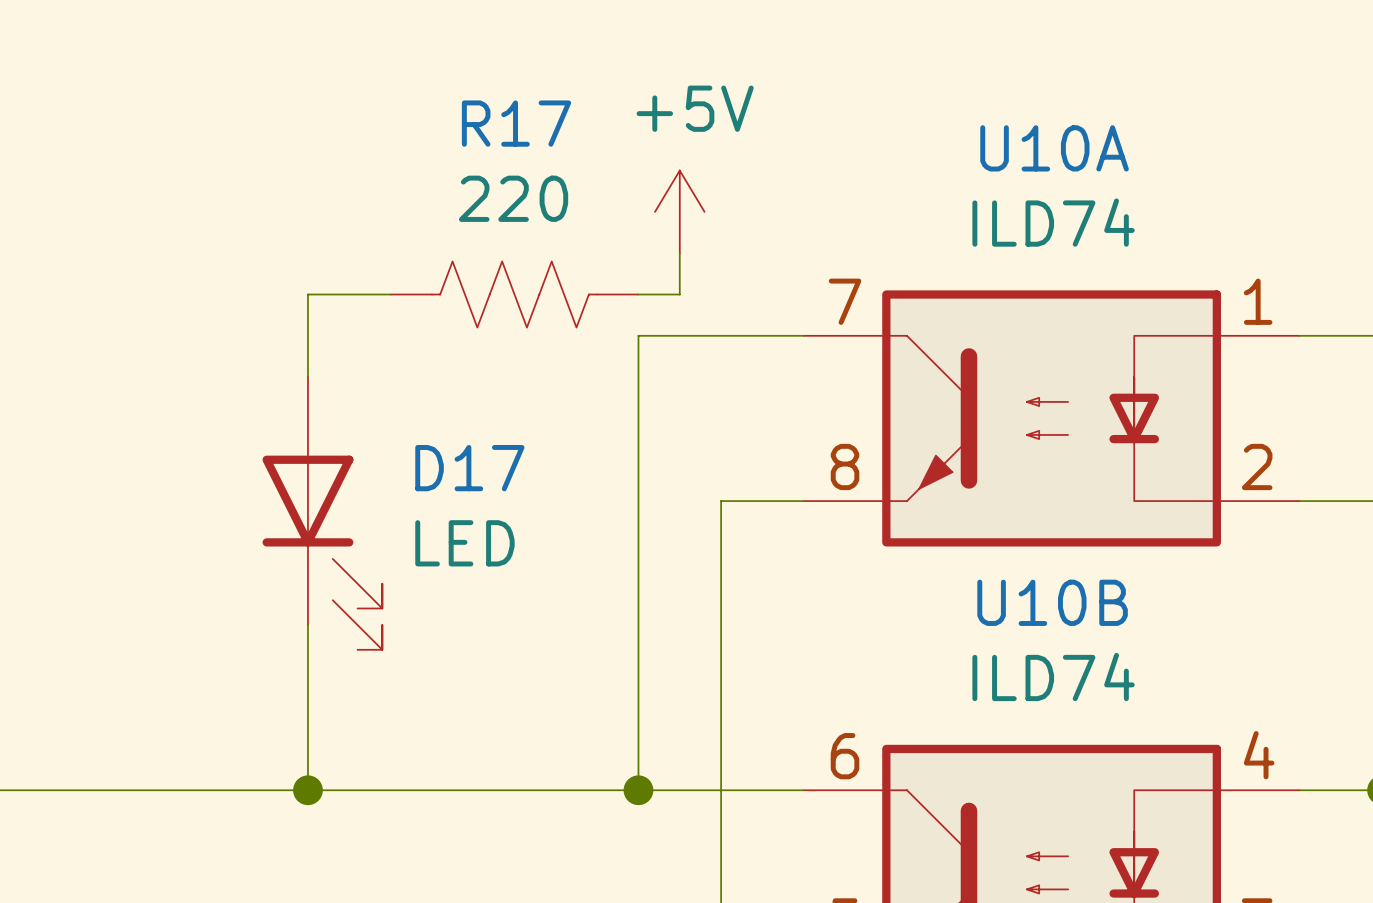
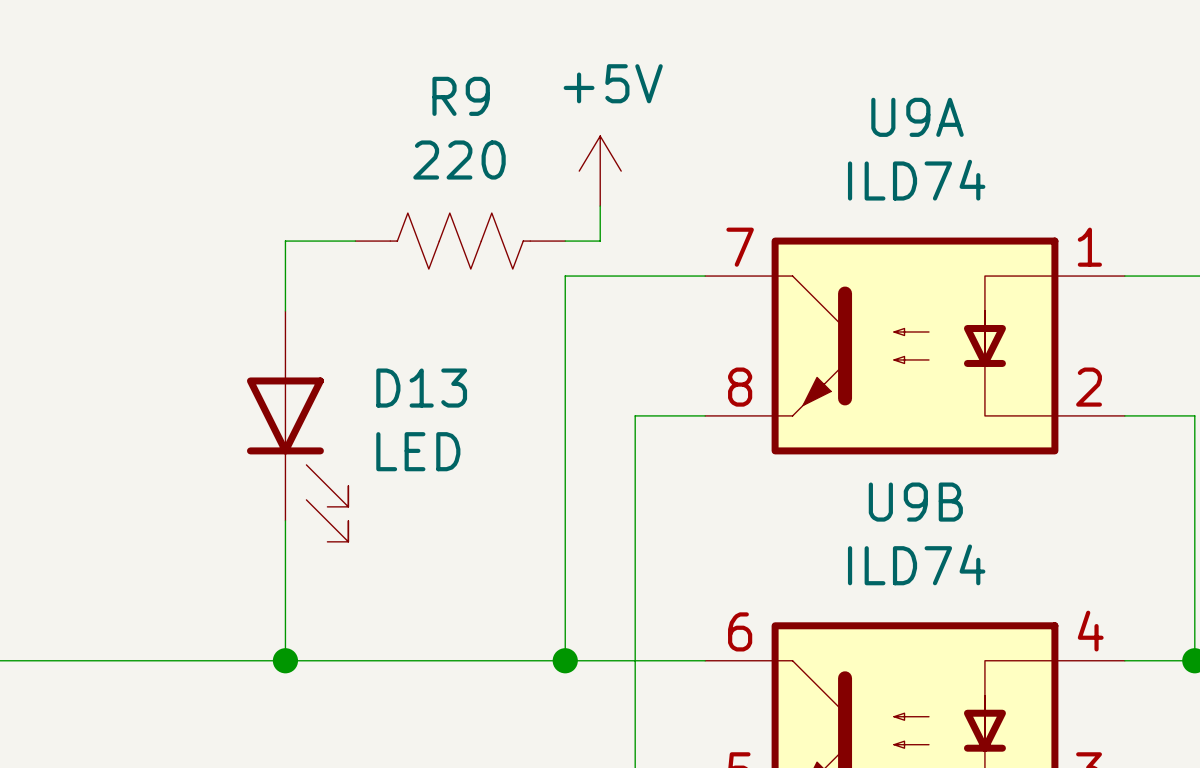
R17 name: R17 (516, 123) -> R9 (461, 96)
U10A name: U10A (1054, 148) -> U9A (917, 117)
D17 name: D17 (469, 468) -> D13 (421, 388)
U10B name: U10B (1052, 602) -> U9B (915, 502)

